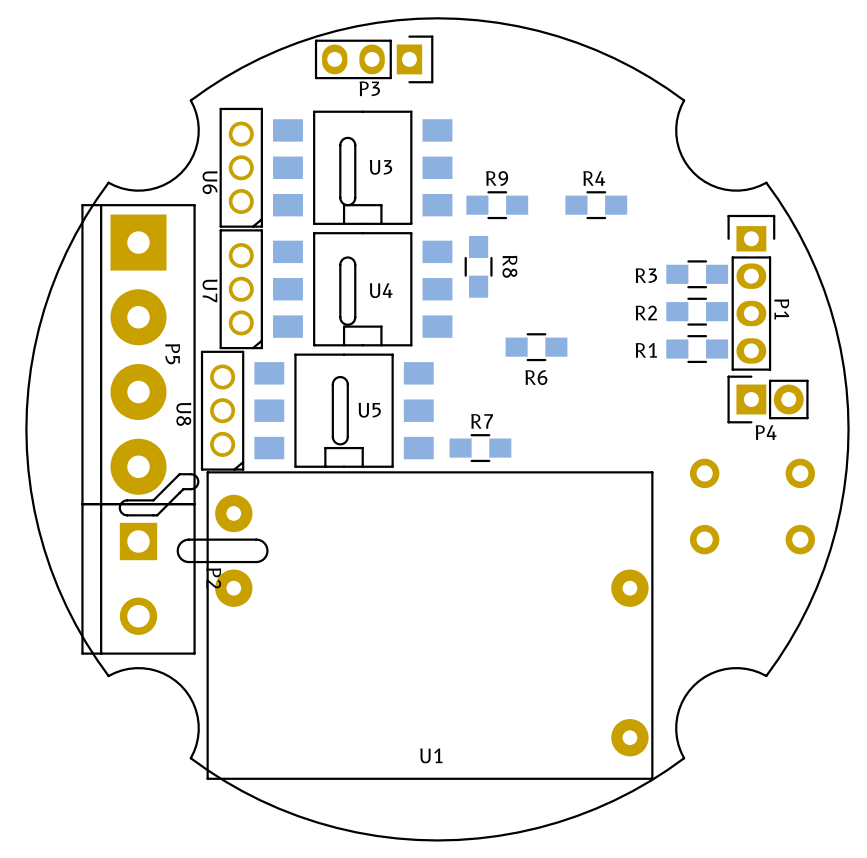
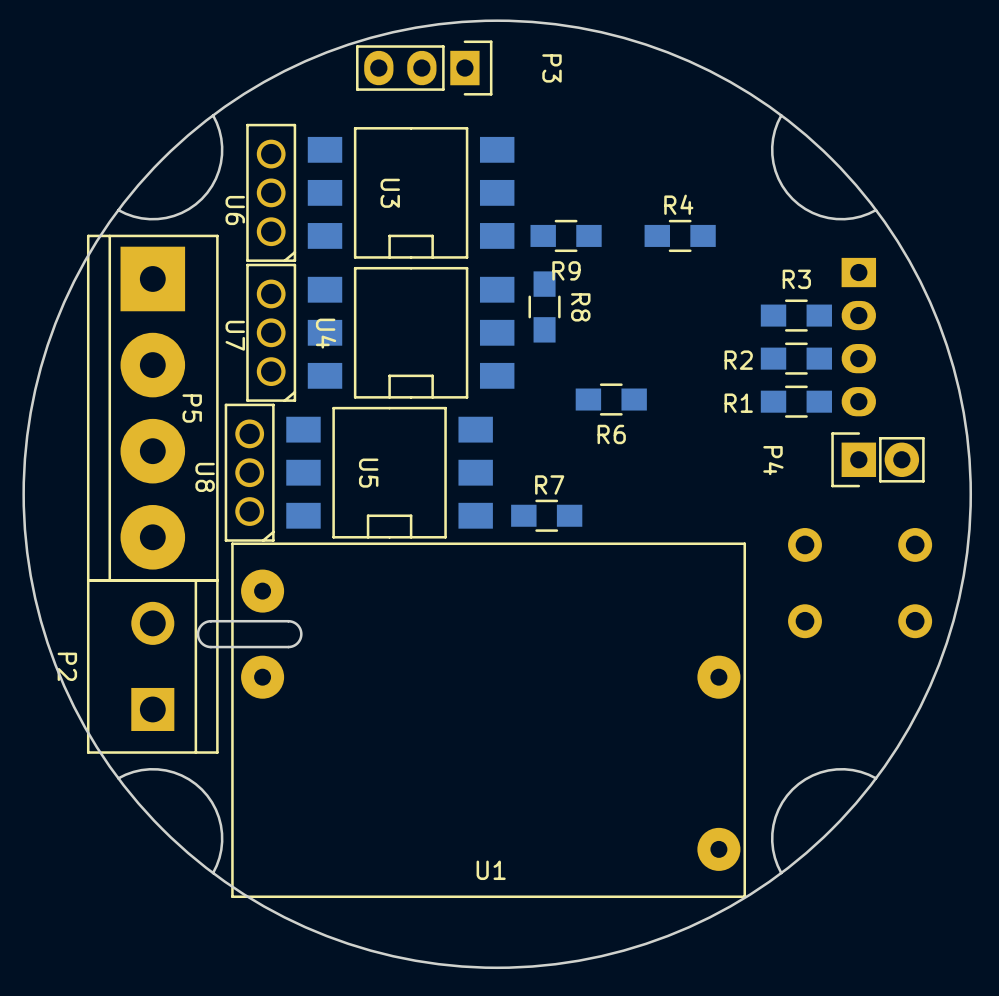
round board edge: none -> [22, 19, 973, 970]
P3 name rotation: 0° (369, 88) -> 90° clockwise (551, 68)
P3 name position: P3 (369, 88) -> P3 (551, 68)
board edge: (684, 100) (632, 67) (596, 50) (557, 36) (498, 22) (437, 18) (376, 22) (317, 36) (278, 50) (242, 67) (190, 100) -> none
board edge: (355, 145) (355, 198) (352, 203) (346, 205) (342, 202) (340, 198) (340, 144) (343, 139) (347, 137) (353, 140) (355, 145) -> none
U3 name rotation: 0° (380, 167) -> 90° clockwise (390, 193)
U3 name position: U3 (380, 167) -> U3 (390, 193)
R9 name position: R9 (497, 178) -> R9 (566, 270)
board edge: (108, 182) (75, 234) (50, 289) (38, 328) (30, 368) (26, 429) (28, 470) (34, 510) (50, 568) (75, 624) (108, 676) -> none
board edge: (766, 182) (799, 234) (816, 270) (830, 309) (844, 368) (848, 429) (844, 490) (830, 549) (816, 587) (799, 624) (766, 676) -> none
board edge: (355, 264) (355, 318) (352, 323) (346, 324) (342, 322) (340, 318) (340, 263) (343, 259) (347, 257) (353, 259) (355, 264) -> none
R3 name position: R3 (646, 275) -> R3 (796, 279)
U4 name rotation: 0° (381, 290) -> 90° clockwise (326, 333)
U4 name position: U4 (381, 290) -> U4 (326, 333)
P1 side: bottom (751, 292) -> top (858, 337)
board edge: (347, 384) (347, 437) (344, 442) (339, 444) (335, 442) (332, 437) (332, 383) (335, 379) (340, 377) (345, 379) (347, 384) -> none
U5 name rotation: 0° (369, 410) -> 90° clockwise (368, 473)
U5 name position: U5 (369, 410) -> U5 (368, 473)
P4 name rotation: 0° (766, 432) -> 90° clockwise (773, 460)
P4 name position: P4 (766, 432) -> P4 (773, 460)
board edge: (190, 474) (179, 474) (153, 500) (123, 501) (120, 505) (120, 511) (126, 515) (157, 515) (183, 489) (192, 488) (196, 486) (197, 478) (190, 474) -> none
P2 rotation: 0° (138, 578) -> 180° (152, 666)
board edge: (684, 758) (650, 781) (614, 800) (557, 822) (498, 835) (437, 840) (376, 835) (317, 822) (260, 800) (224, 781) (190, 758) -> none

